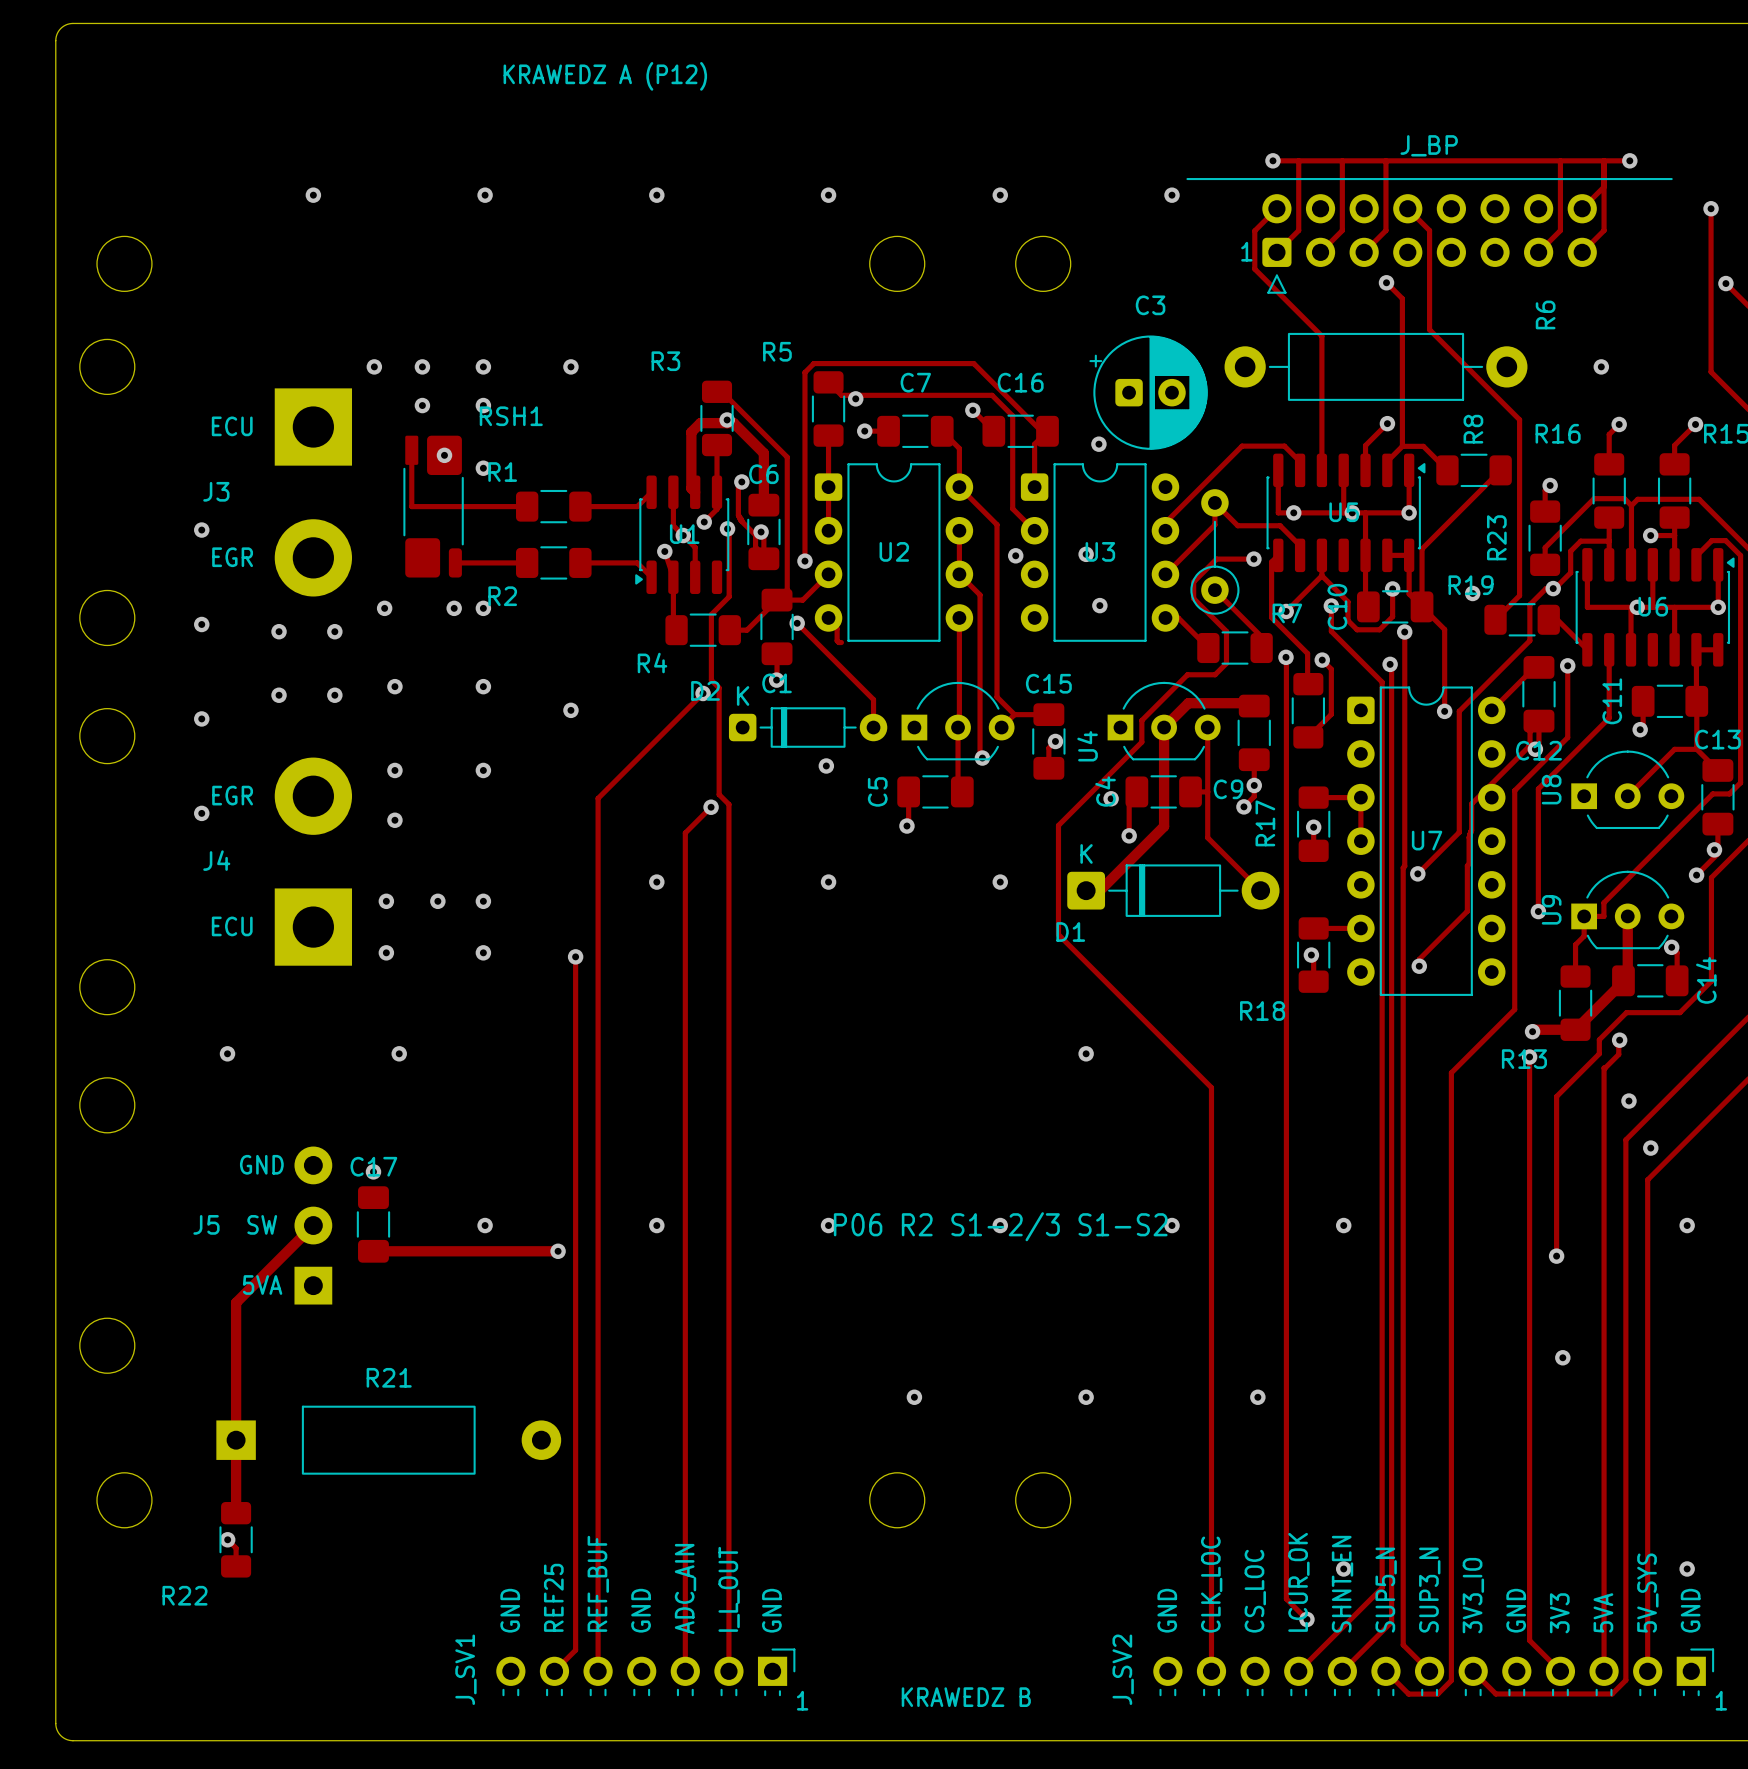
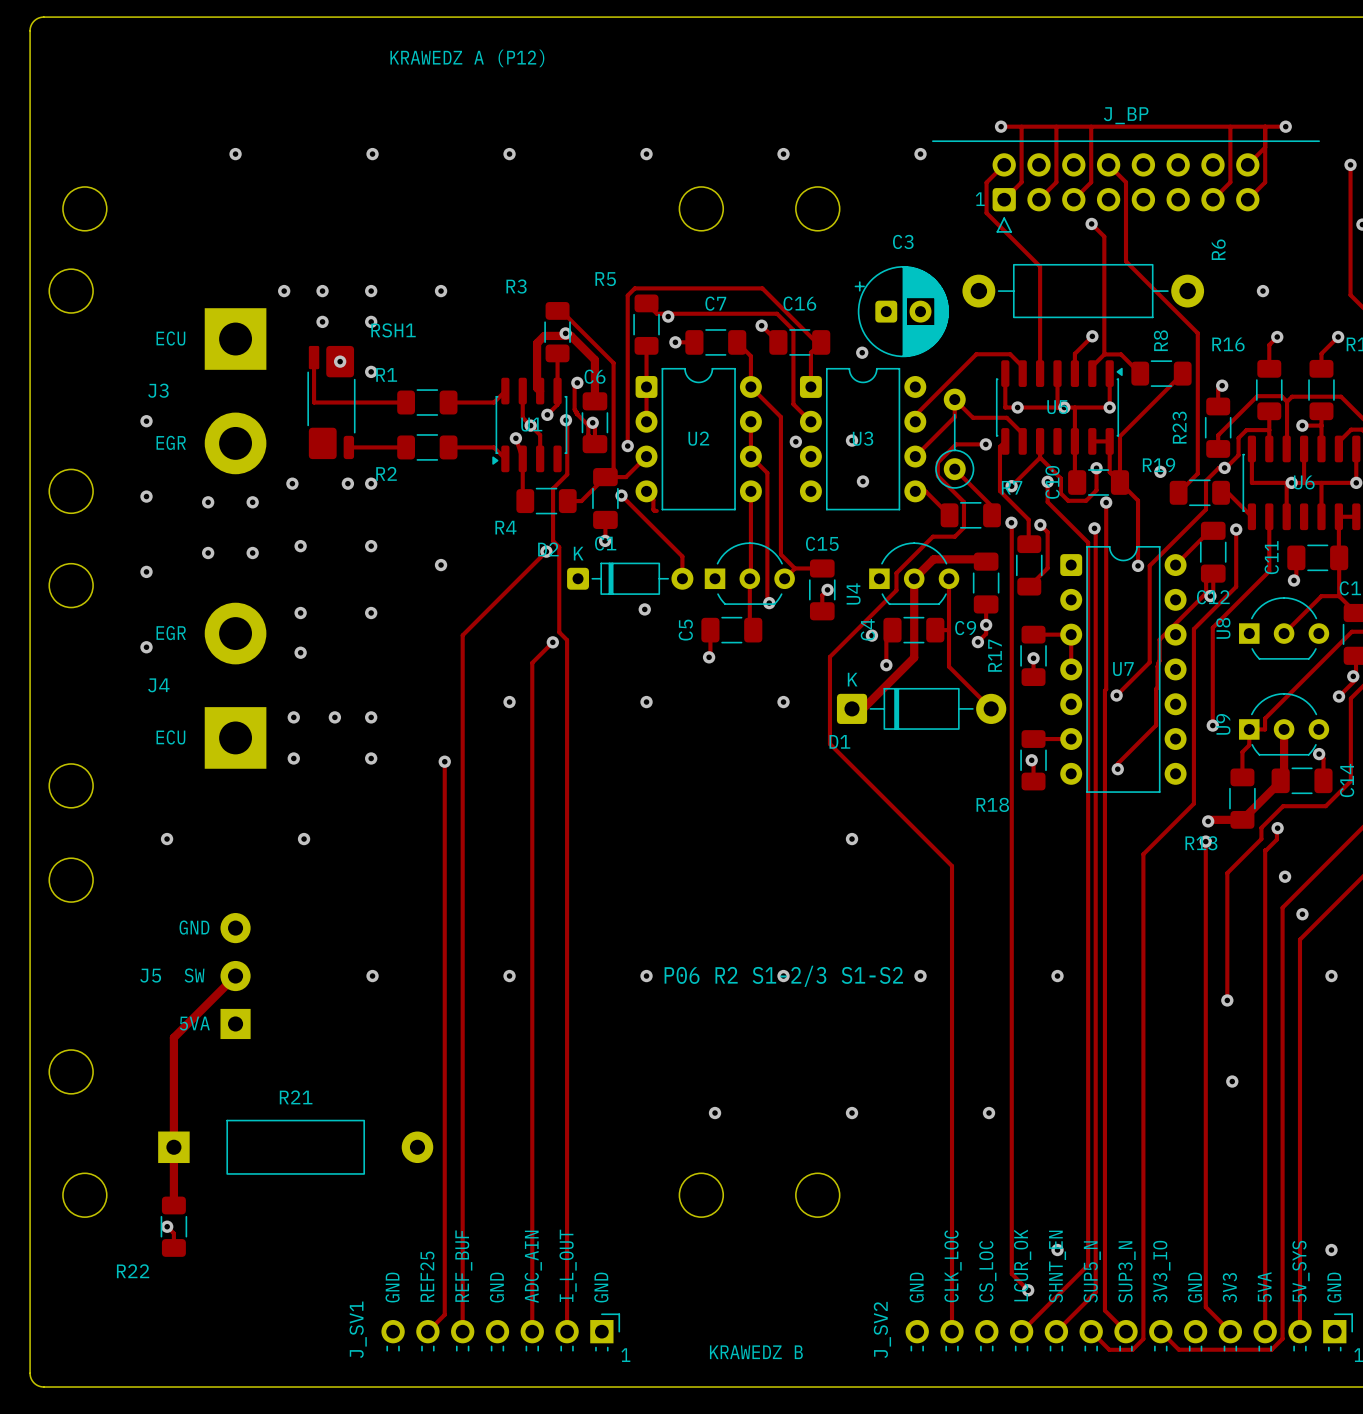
via: (373, 1171) -> none
C17: (373, 1224) -> none
track: (373, 1251) (558, 1251) -> none
via: (558, 1251) -> none

